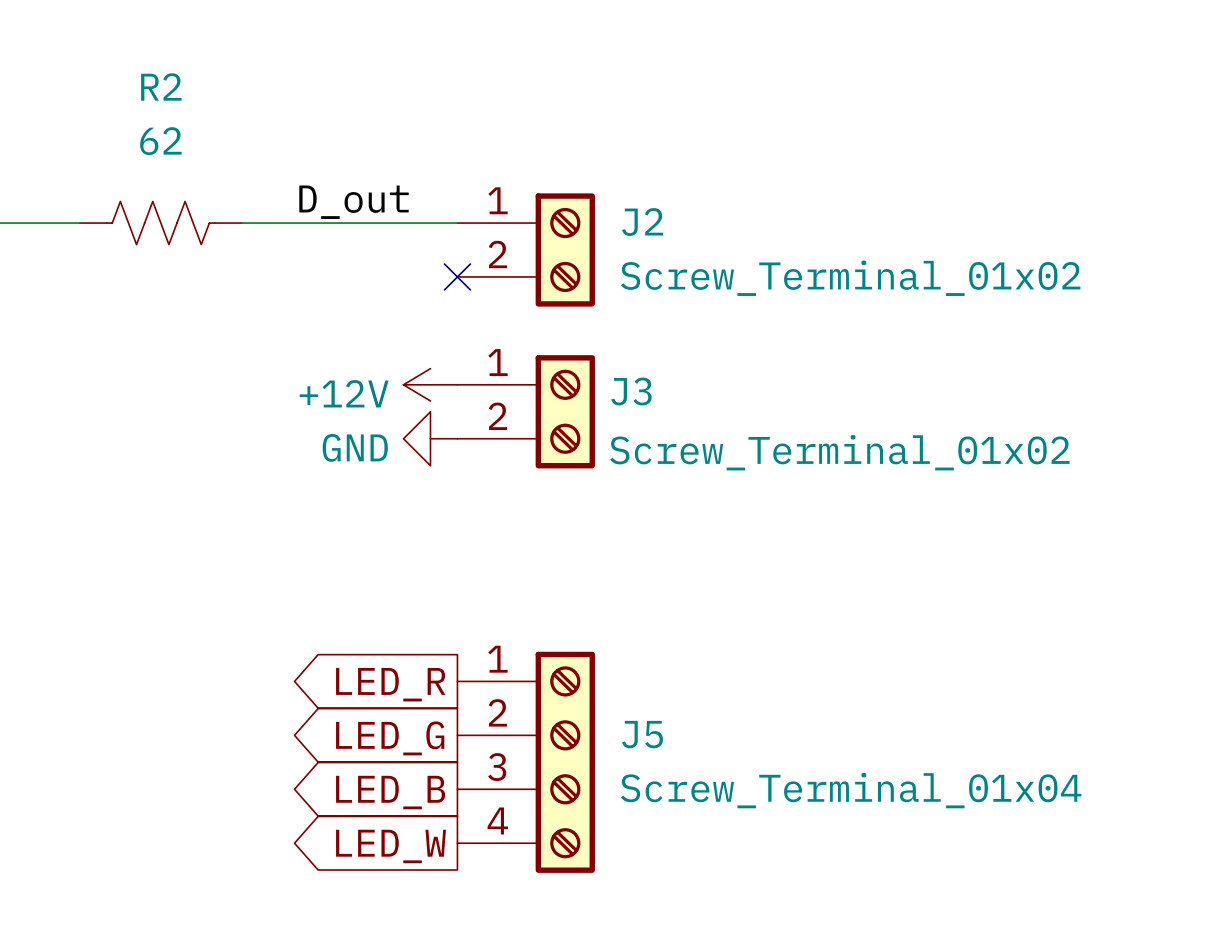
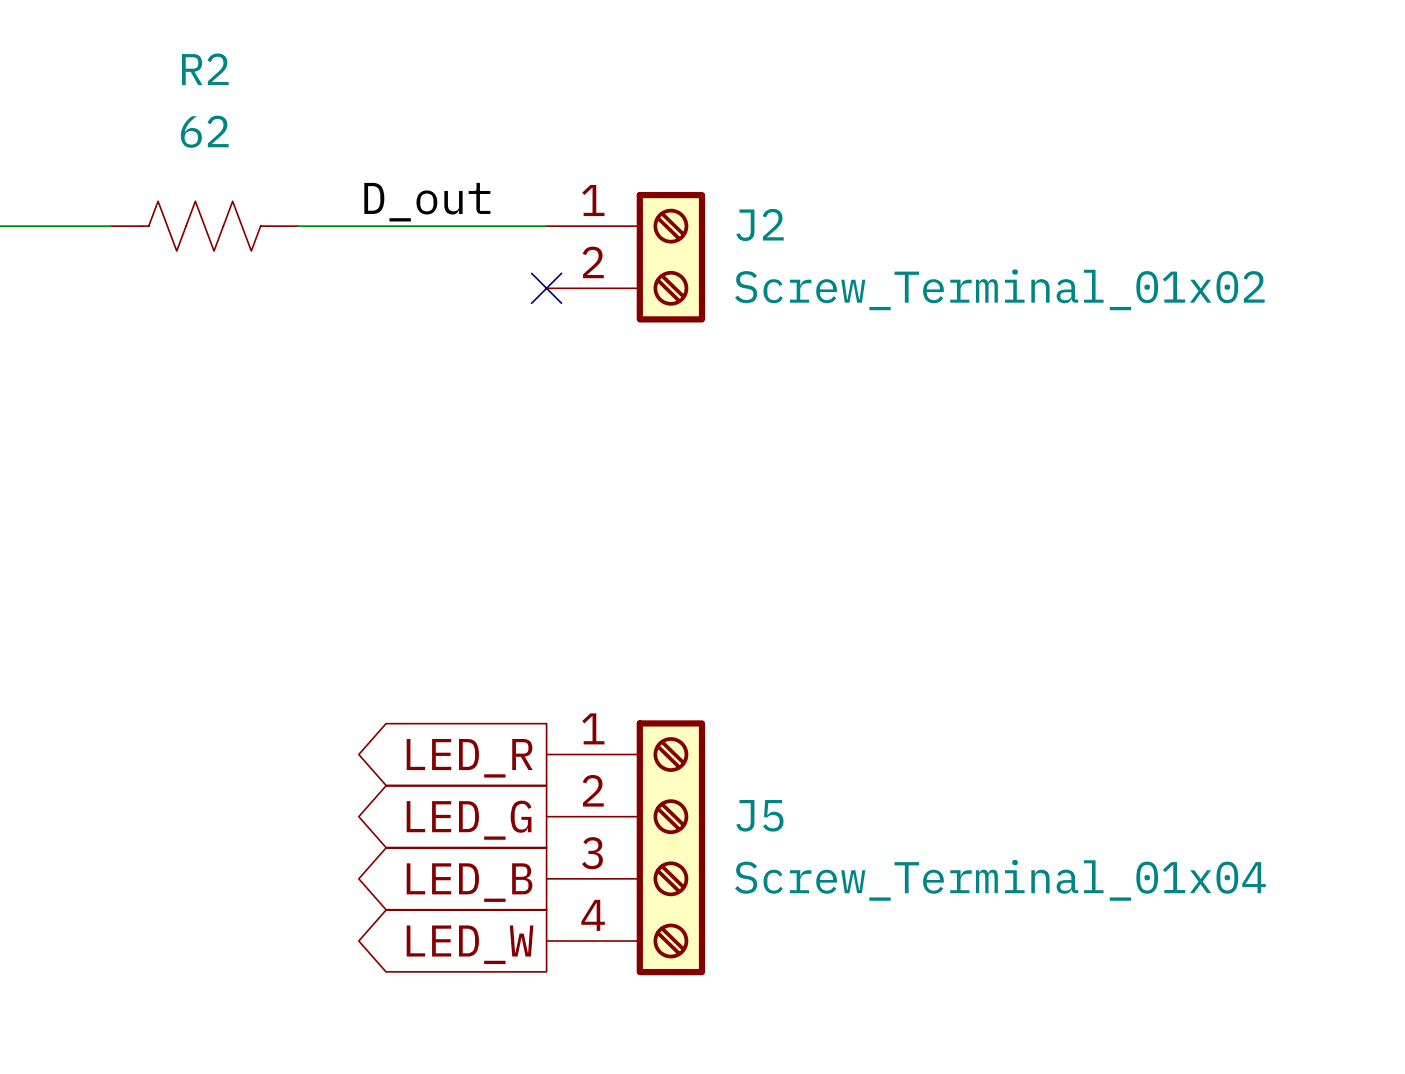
power symbol: +12V (430, 384) -> none
J3: Screw_Terminal_01x02 (526, 411) -> none
power symbol: GND (430, 438) -> none

